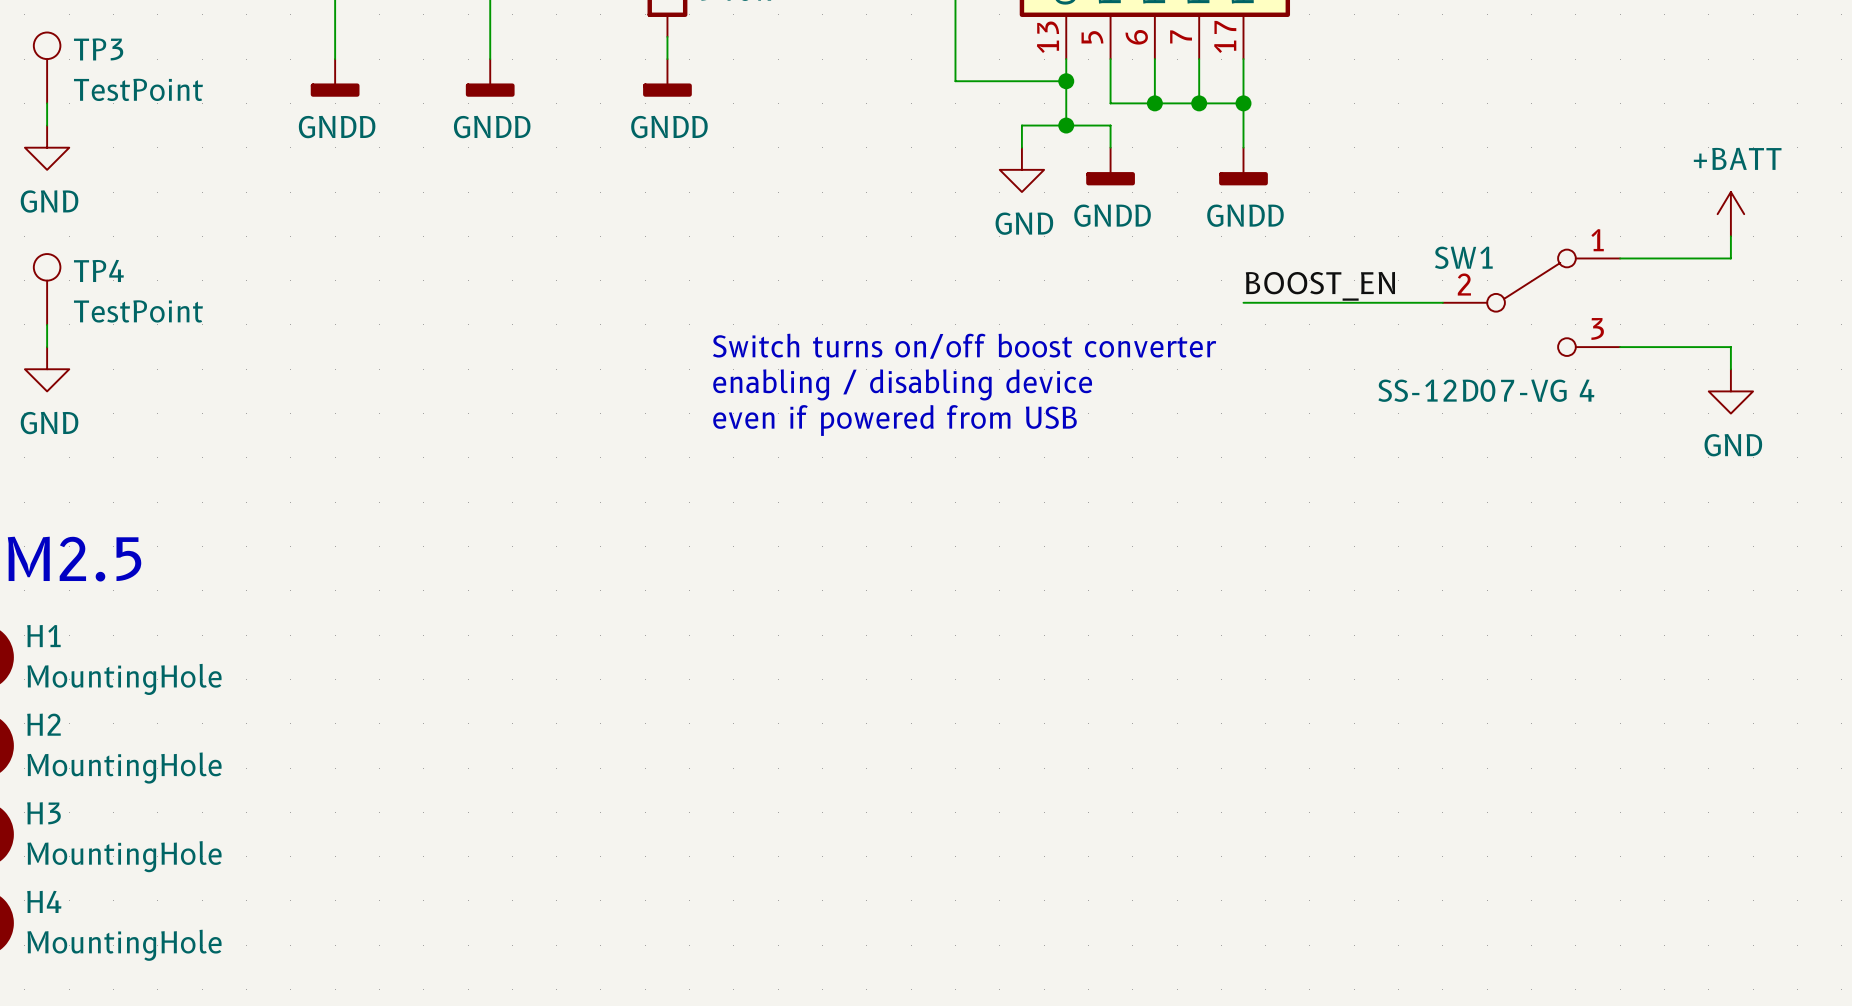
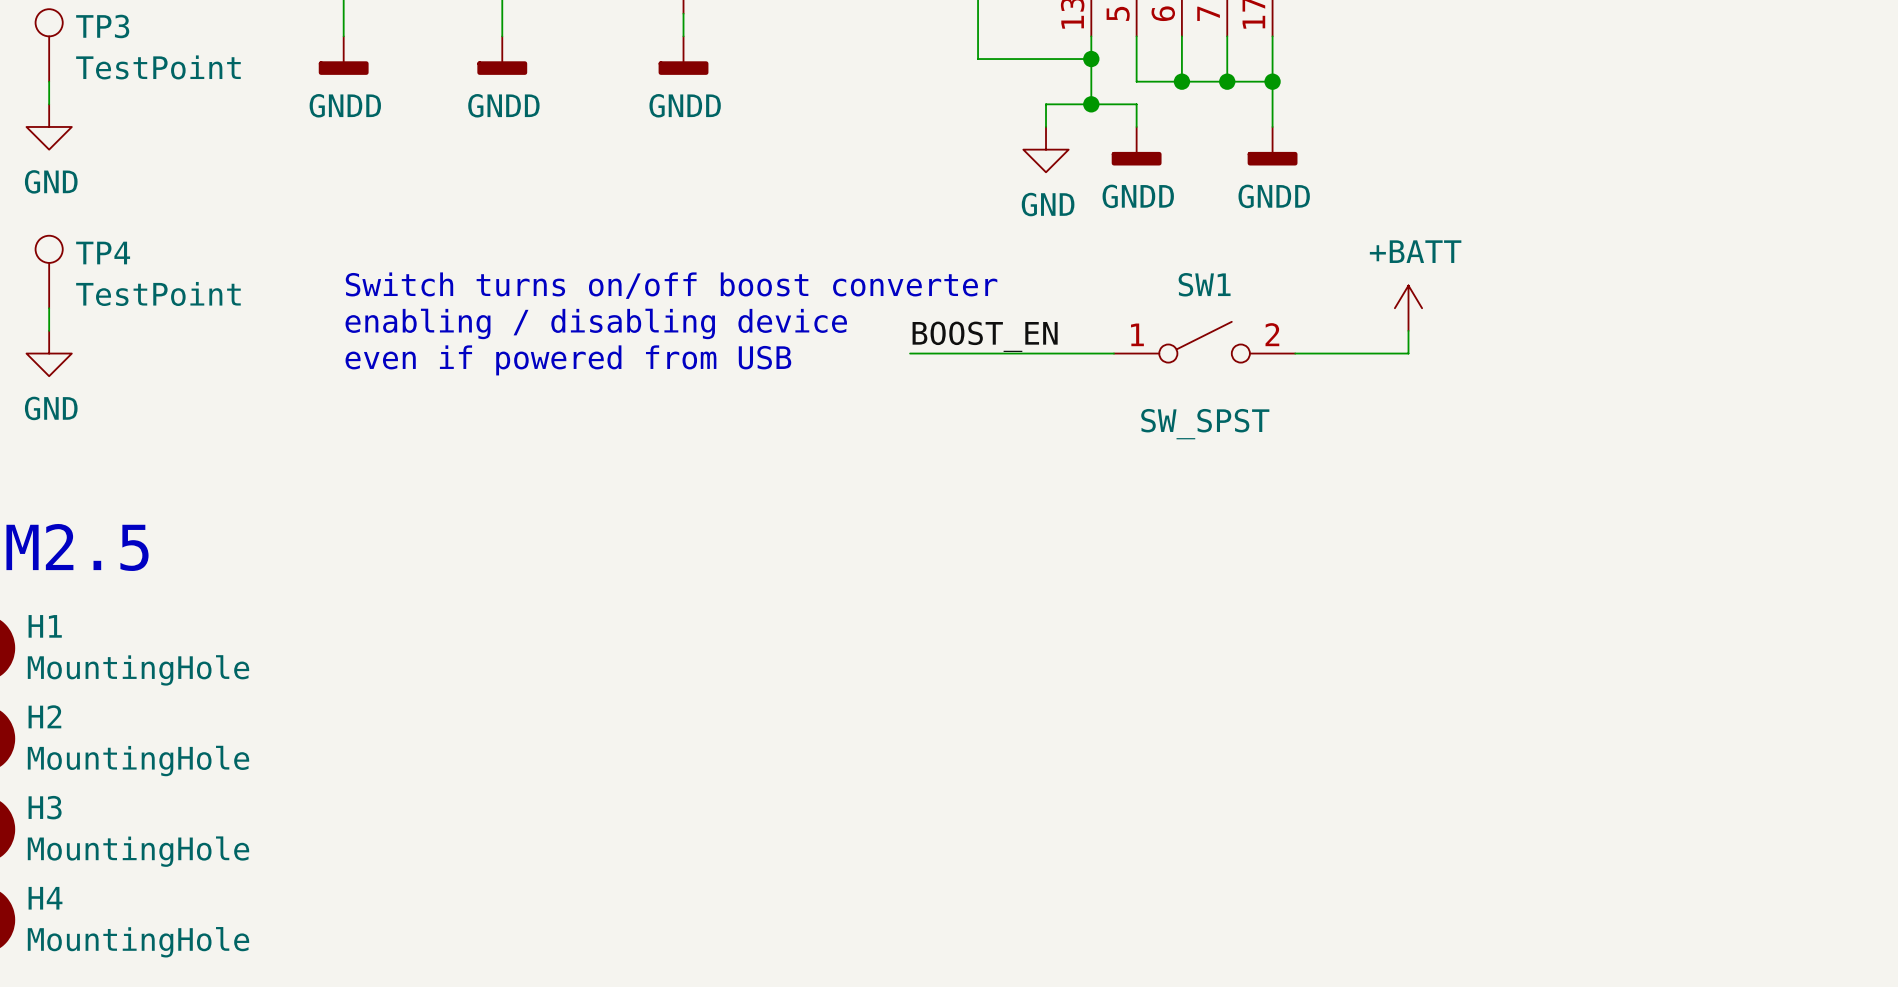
power symbol position: +BATT (1730, 214) -> +BATT (1408, 308)
wire: (1730, 236) (1730, 258) (1620, 258) -> (1408, 330) (1408, 353) (1295, 353)
SW1 symbol: [1442, 249, 1621, 356] -> [1113, 321, 1296, 363]
SW1 name position: SW1 (1463, 257) -> SW1 (1204, 284)
label position: BOOST_EN (1320, 286) -> BOOST_EN (985, 336)
wire: (1243, 302) (1442, 302) -> (910, 353) (1113, 353)
text position: Switch turns on/off boost converter (964, 346) -> Switch turns on/off boost converter (671, 285)
wire: (1620, 347) (1730, 347) (1730, 369) -> none
text position: enabling / disabling device (902, 384) -> enabling / disabling device (596, 323)
SW1 value: SS-12D07-VG 4 (1486, 390) -> SW_SPST (1205, 424)
power symbol: GND (1730, 391) -> none
text position: even if powered from USB (895, 420) -> even if powered from USB (568, 360)

